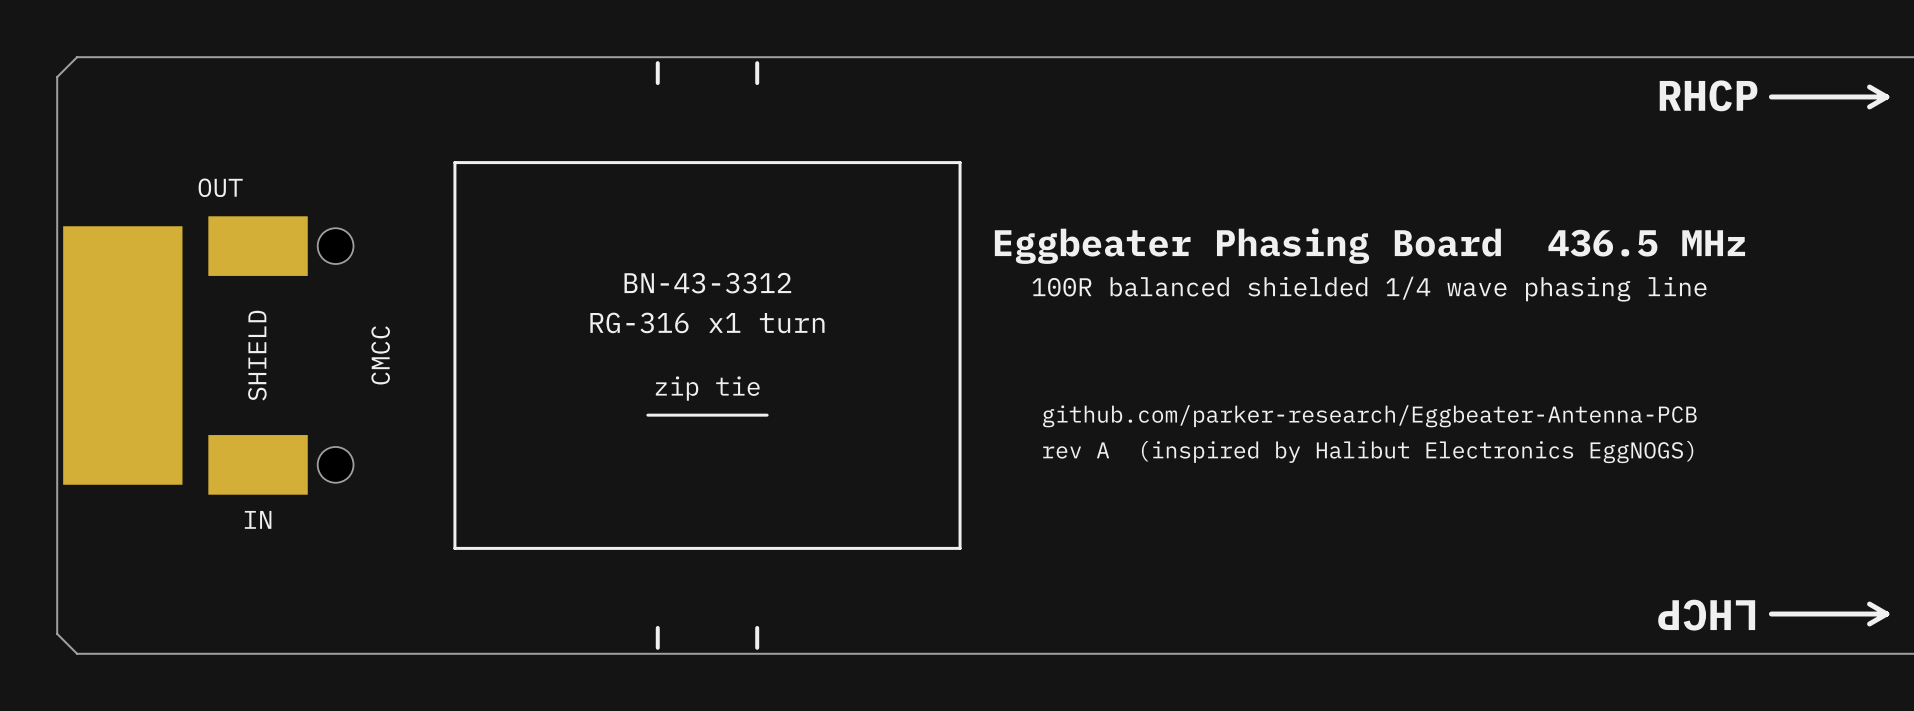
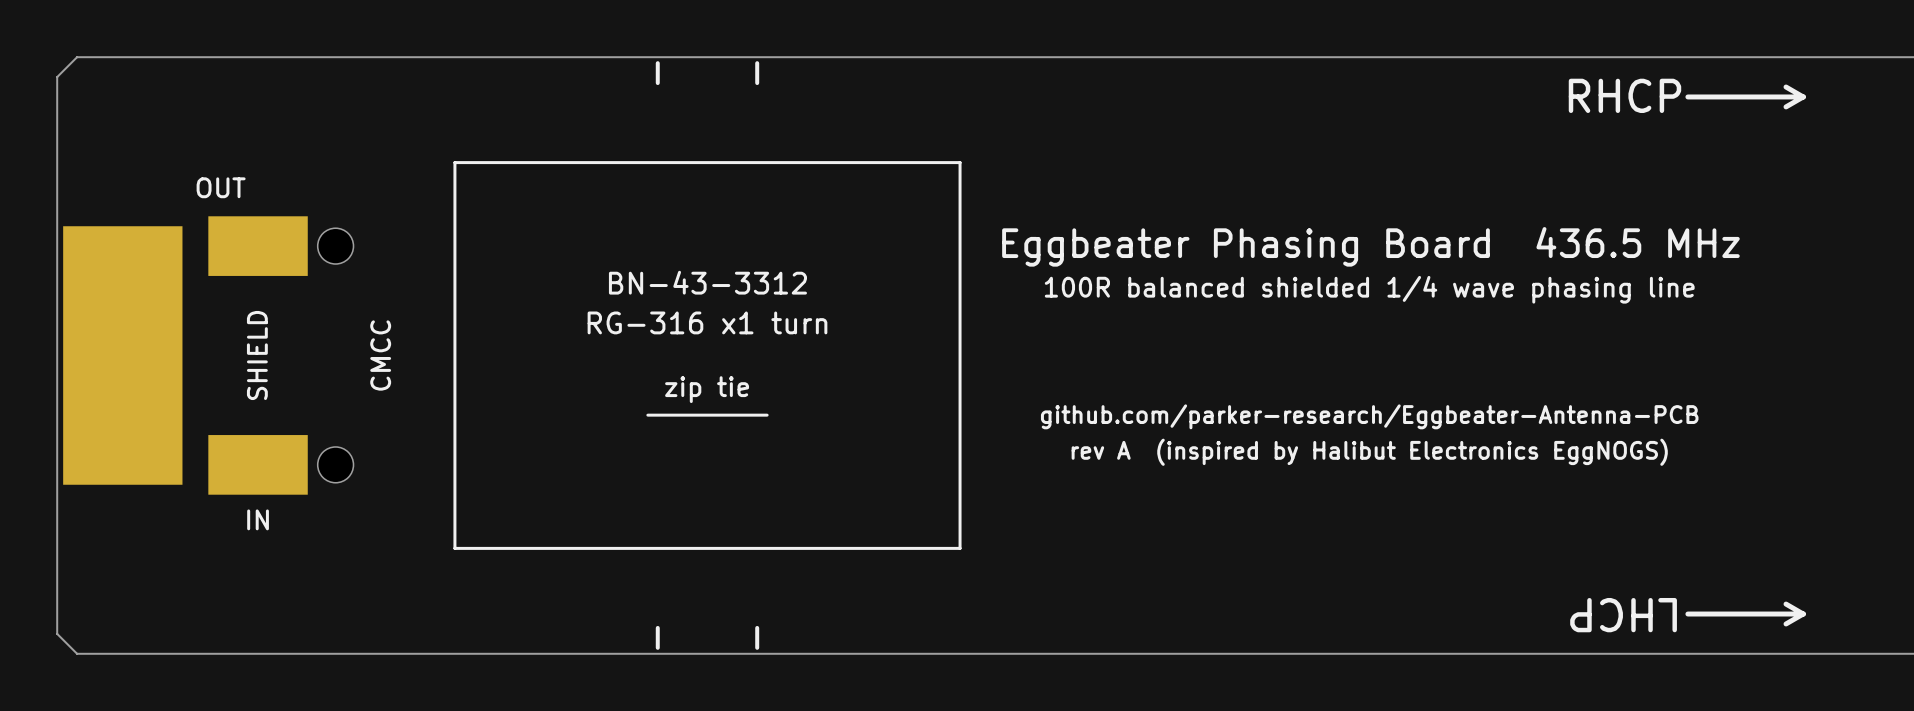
line: none -> (1786, 87) (1803, 96) (1786, 106)
line: (1869, 87) (1886, 96) -> none
text position: RHCP (1708, 95) -> RHCP (1624, 95)
line: (1803, 96) (1886, 96) -> (1687, 96) (1771, 96)
line: (1886, 96) (1869, 106) -> none
line: none -> (1786, 604) (1803, 614) (1786, 623)
line: (1869, 604) (1886, 614) -> none
line: (1803, 614) (1886, 614) -> (1687, 614) (1771, 614)
line: (1886, 614) (1869, 623) -> none
text position: LHCP (1706, 615) -> LHCP (1623, 615)

